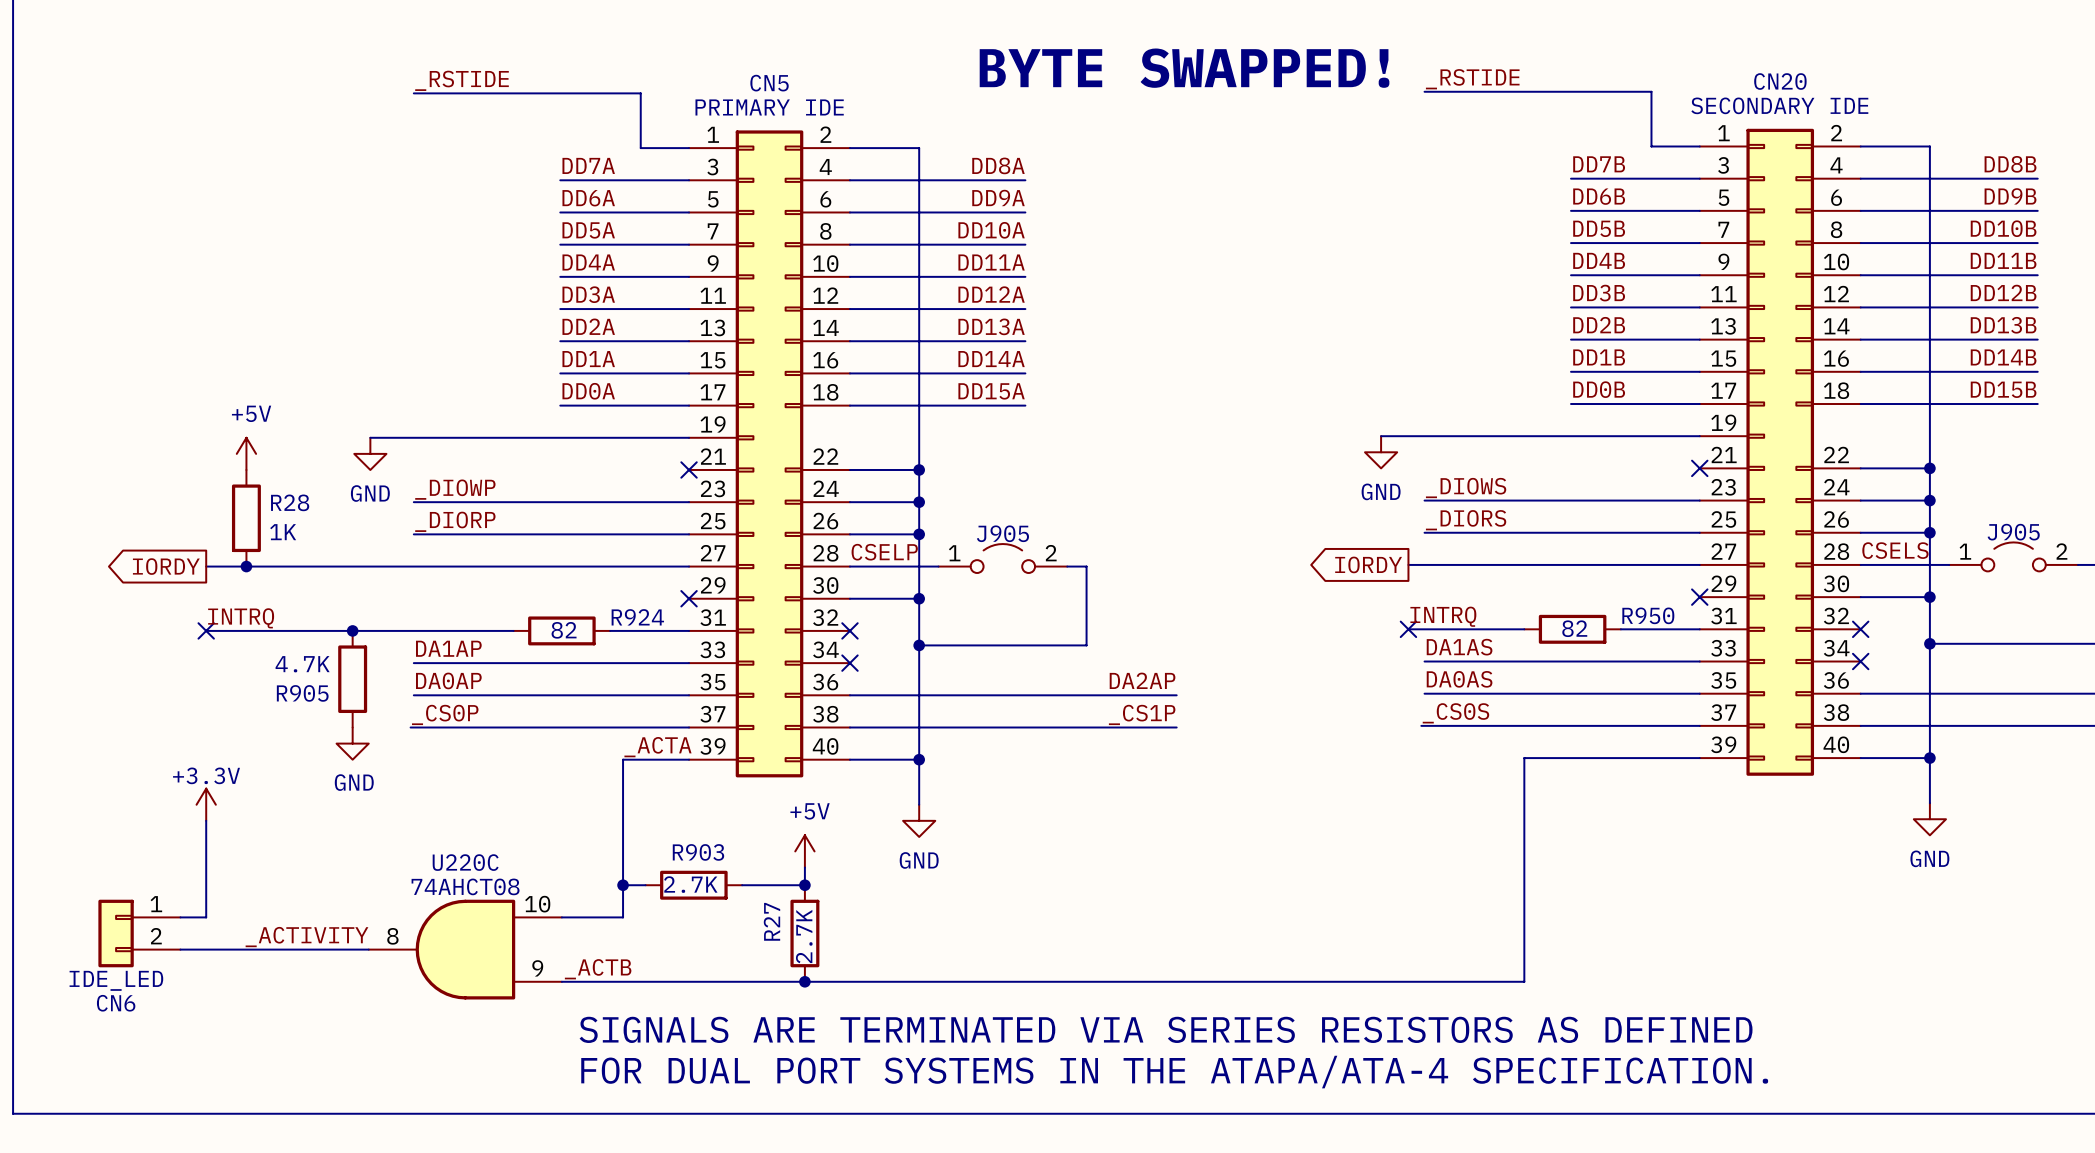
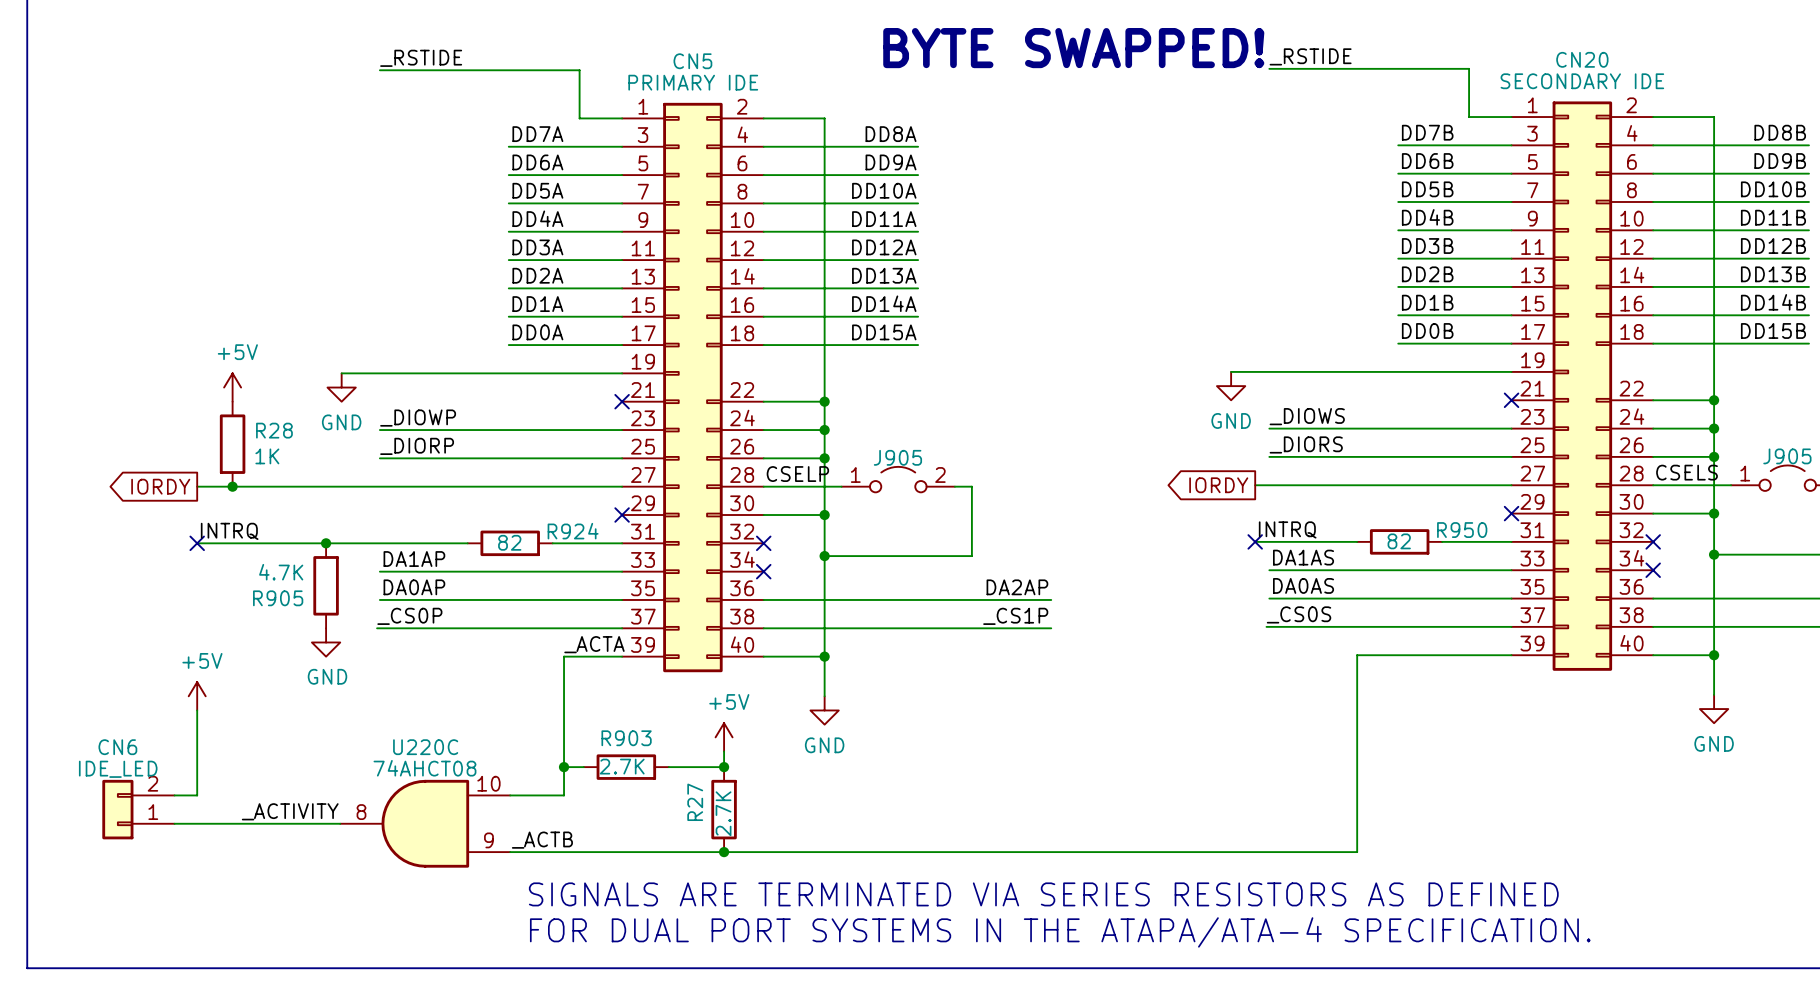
power symbol: +3.3V (206, 804) -> +5V (197, 696)
CN6 flip: as is (116, 933) -> up-down (117, 809)

